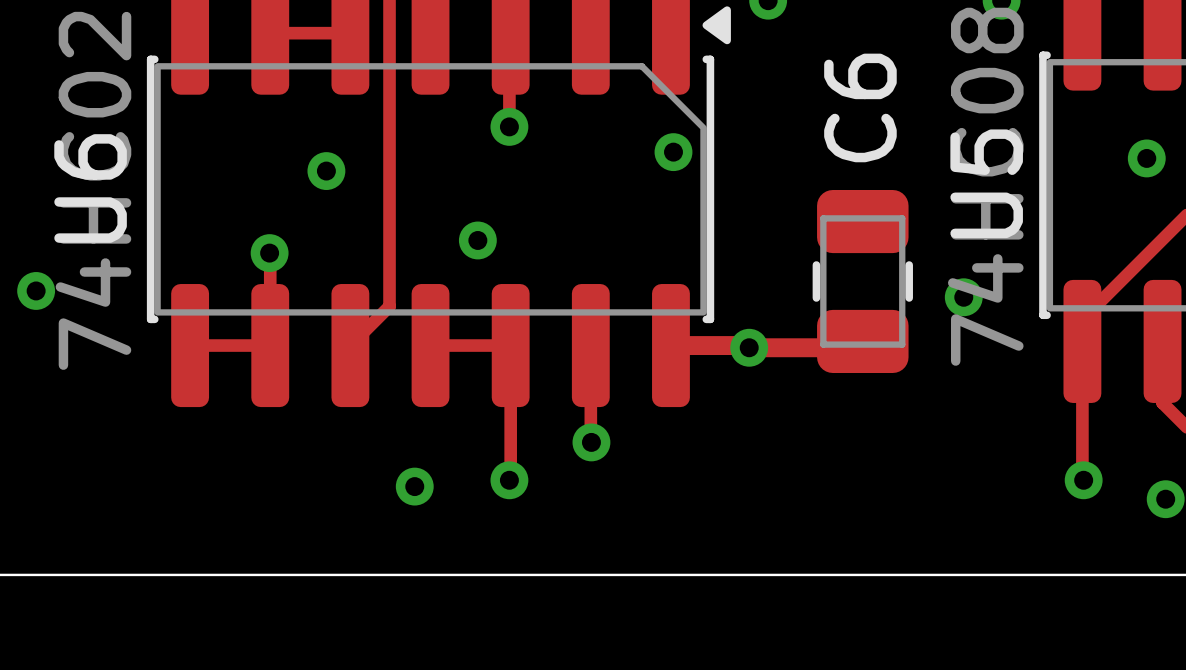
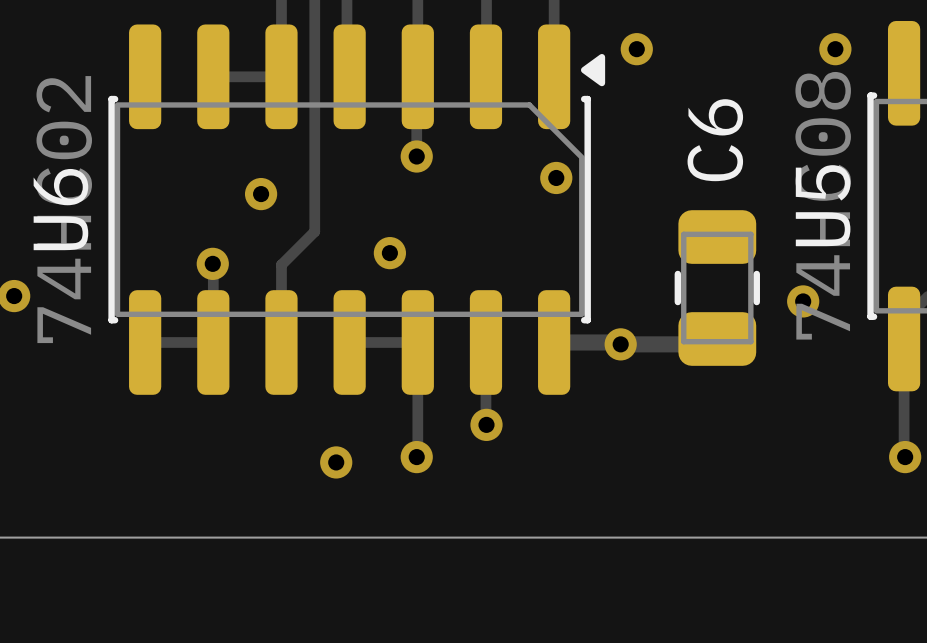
track: (389, 215) (389, 306) (350, 345) -> (314, 231) (281, 264) (281, 342)

